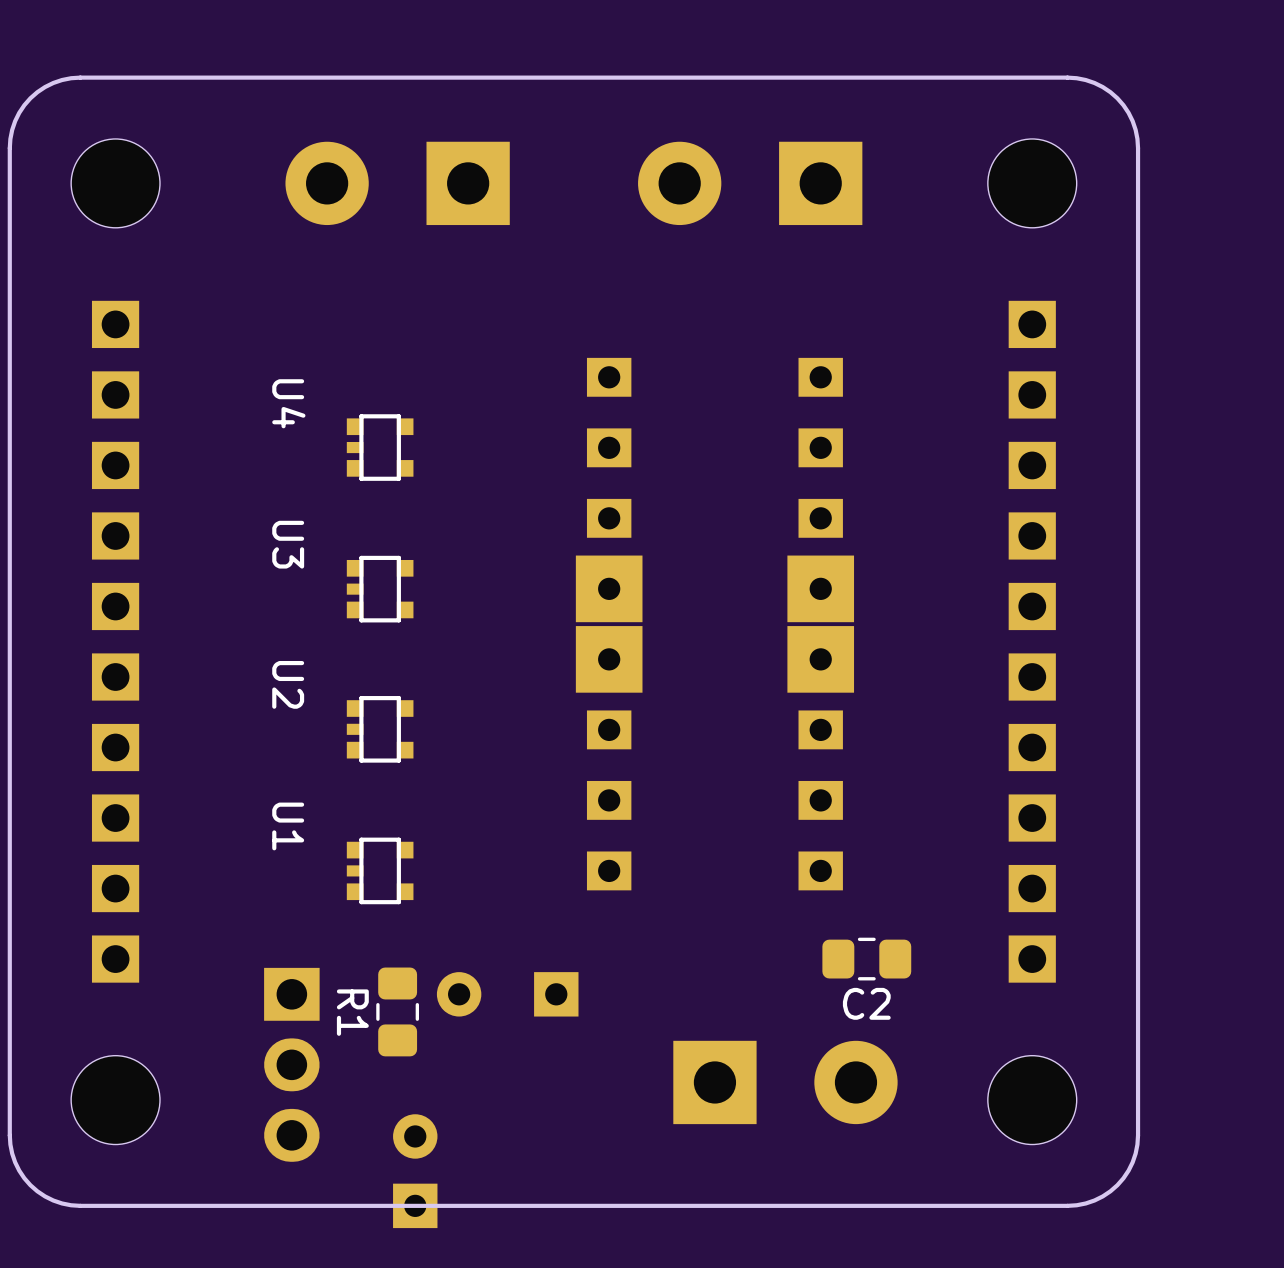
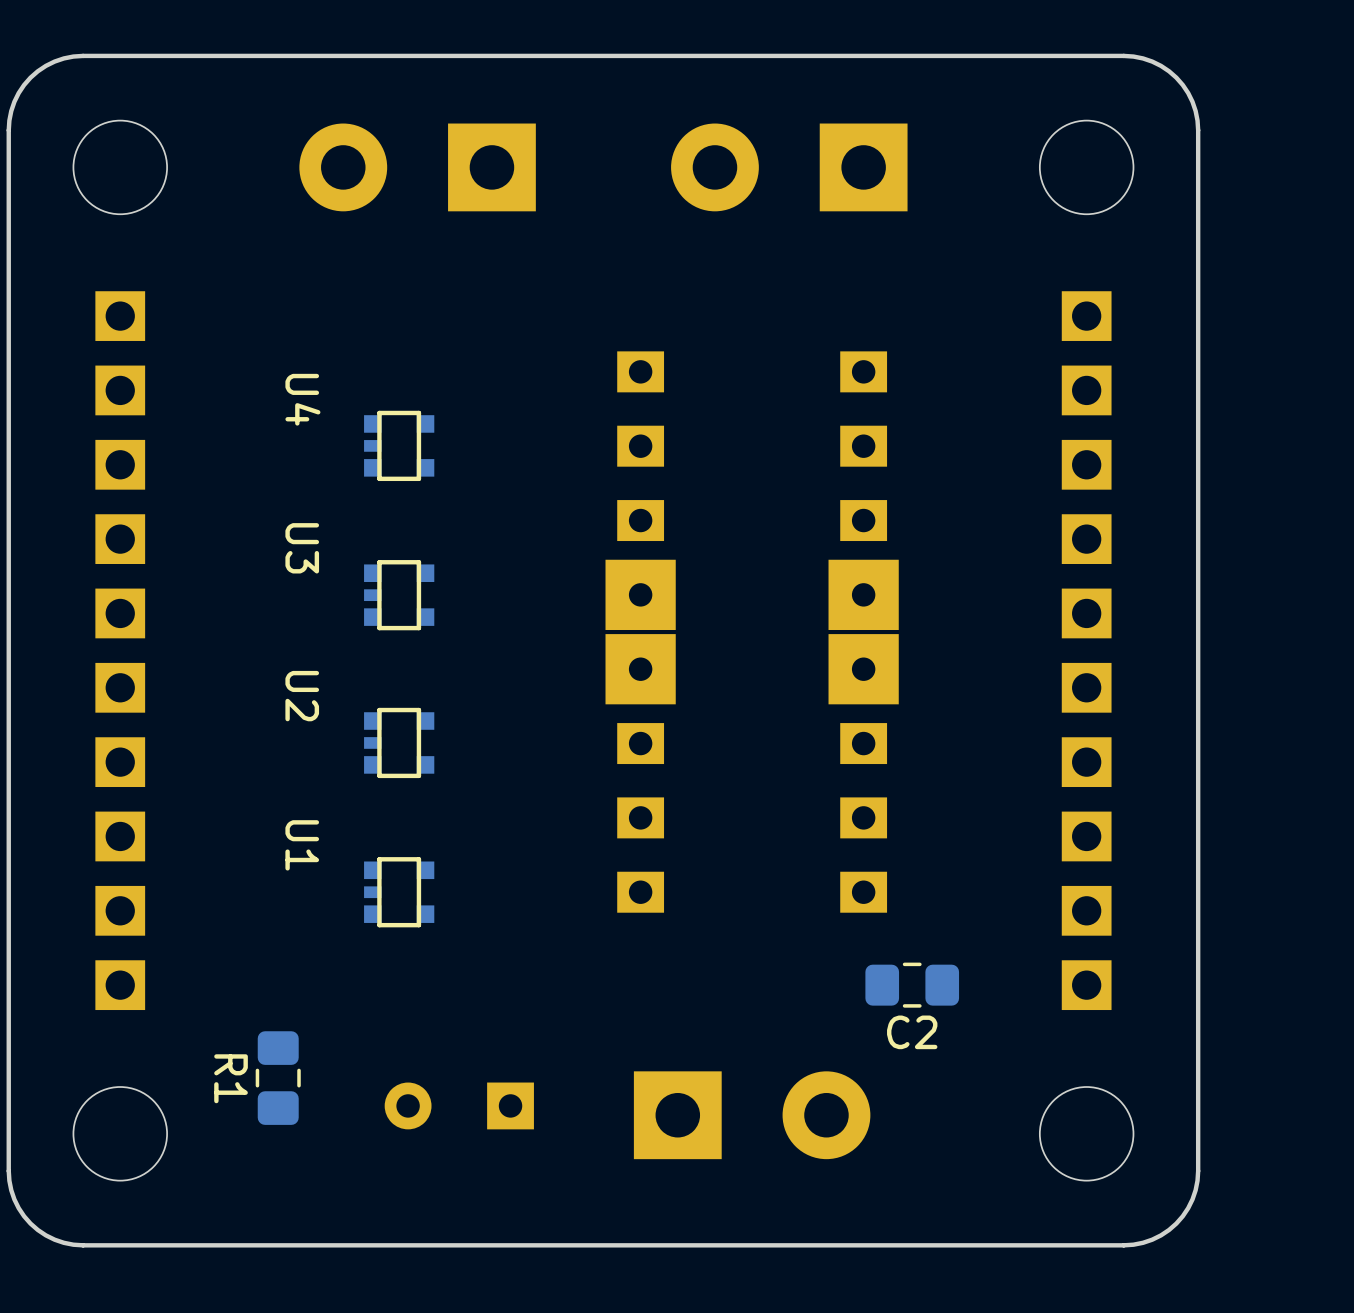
part position: (507, 994) -> (459, 1105)
R1 position: (397, 1011) -> (278, 1078)
part: (291, 1064) -> none
part position: (785, 1082) -> (752, 1115)
part: (415, 1171) -> none

